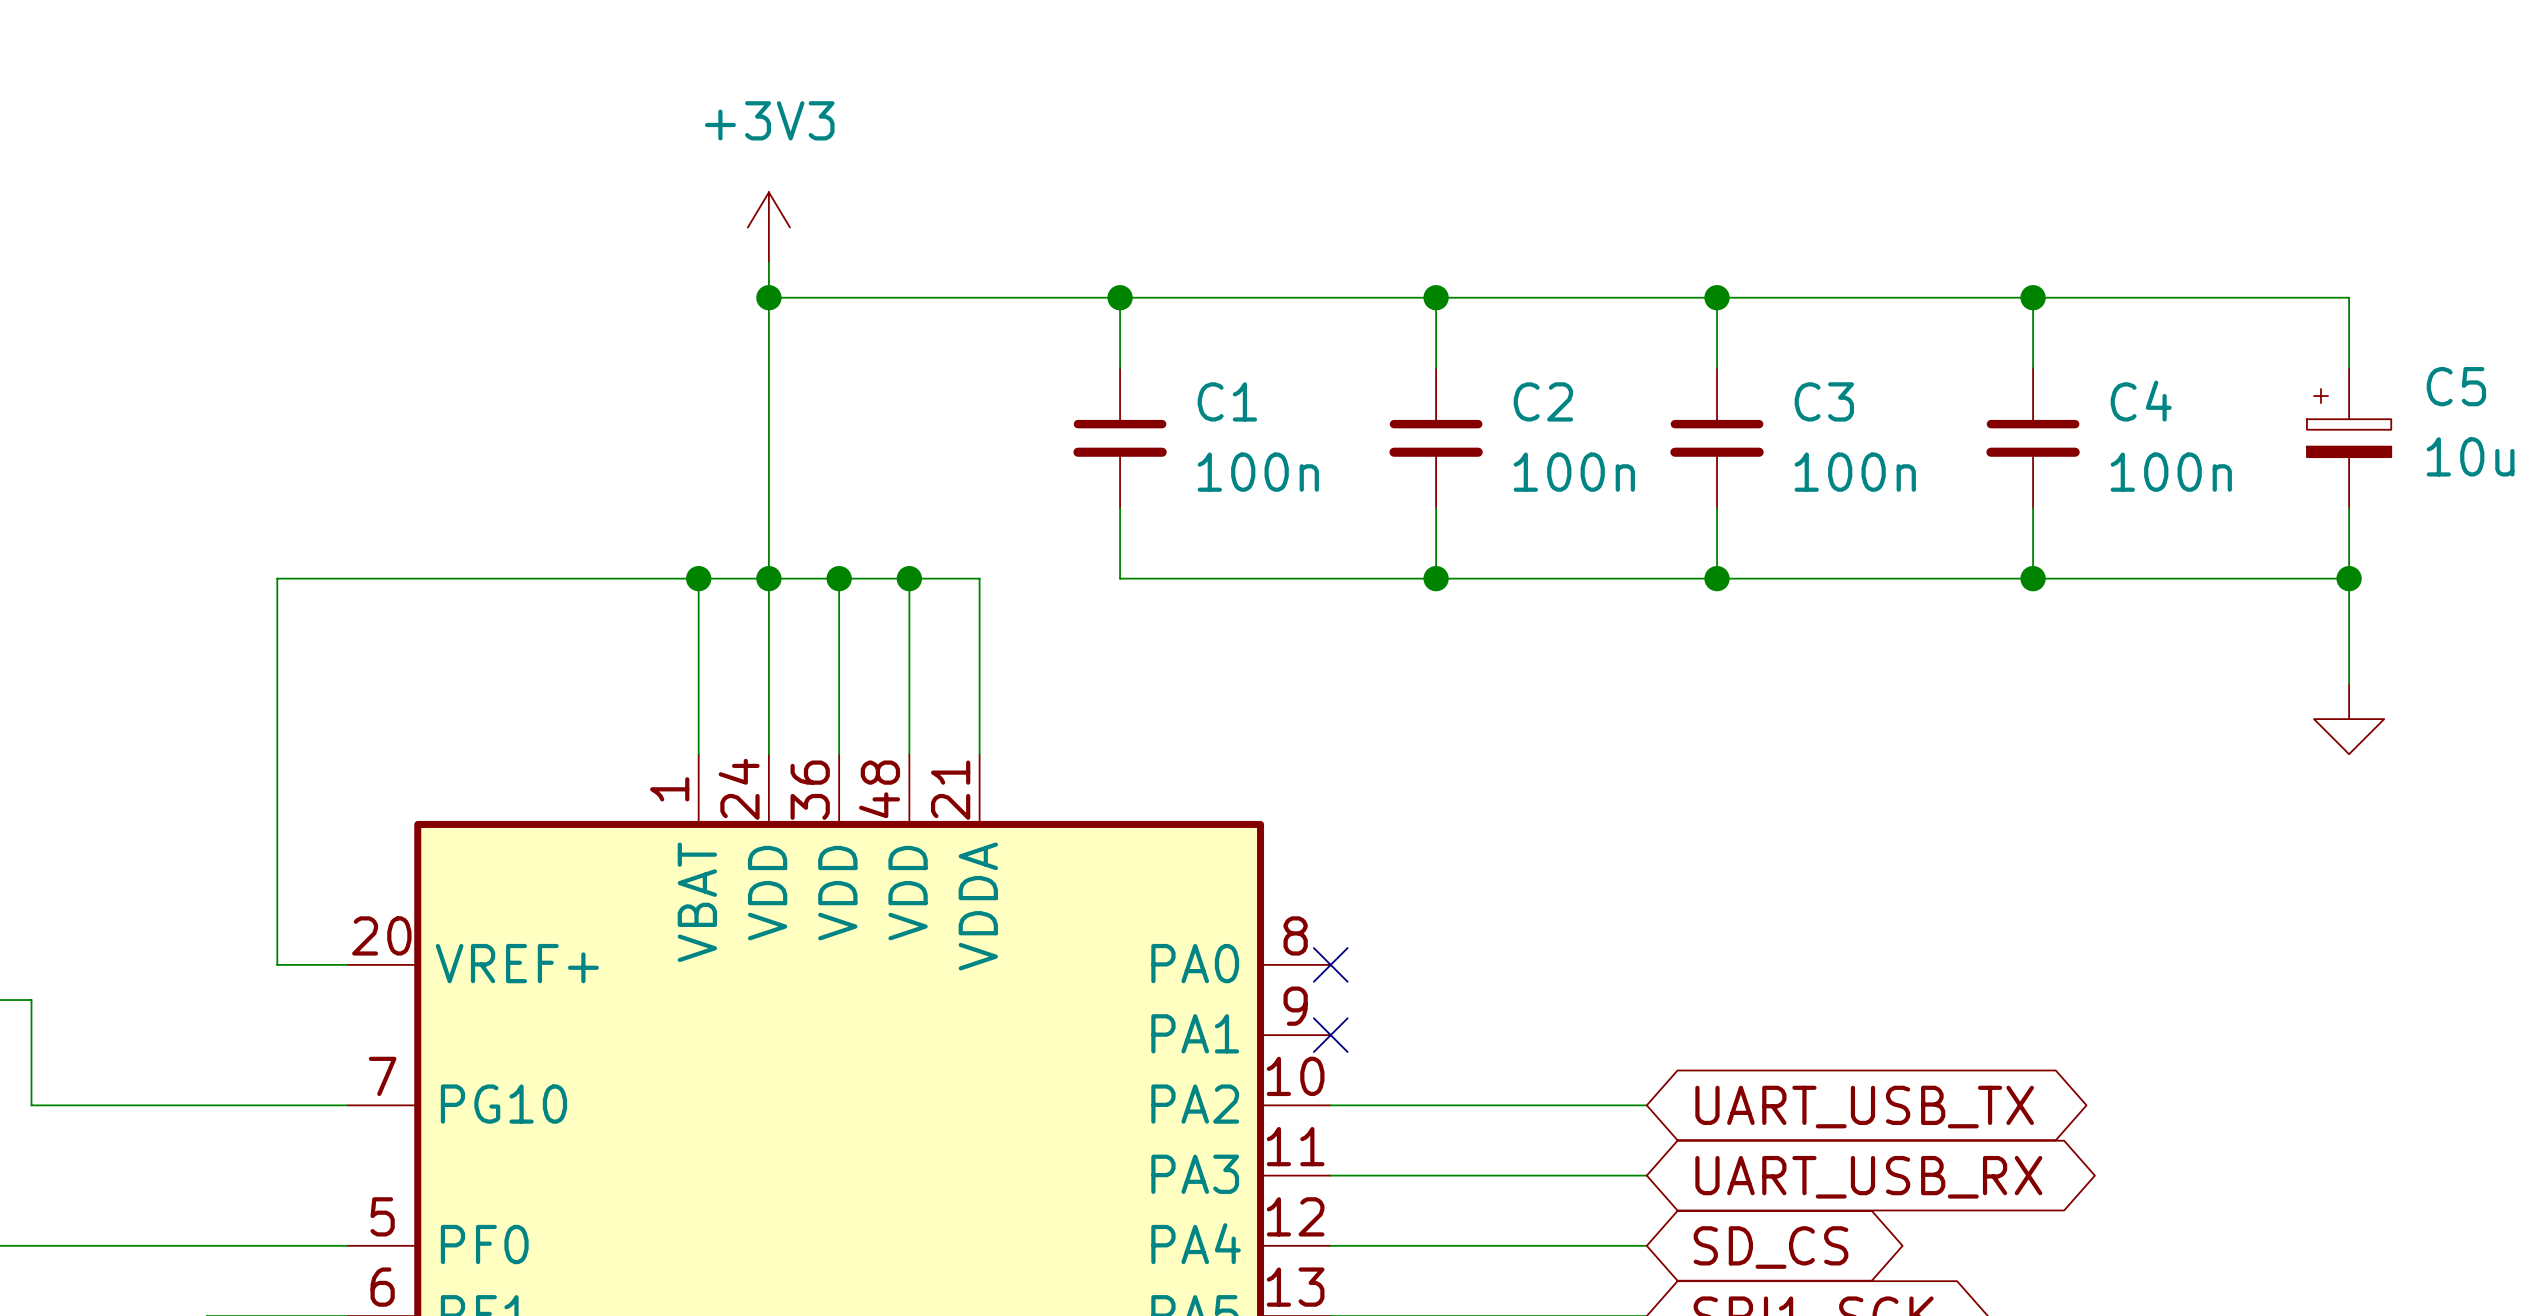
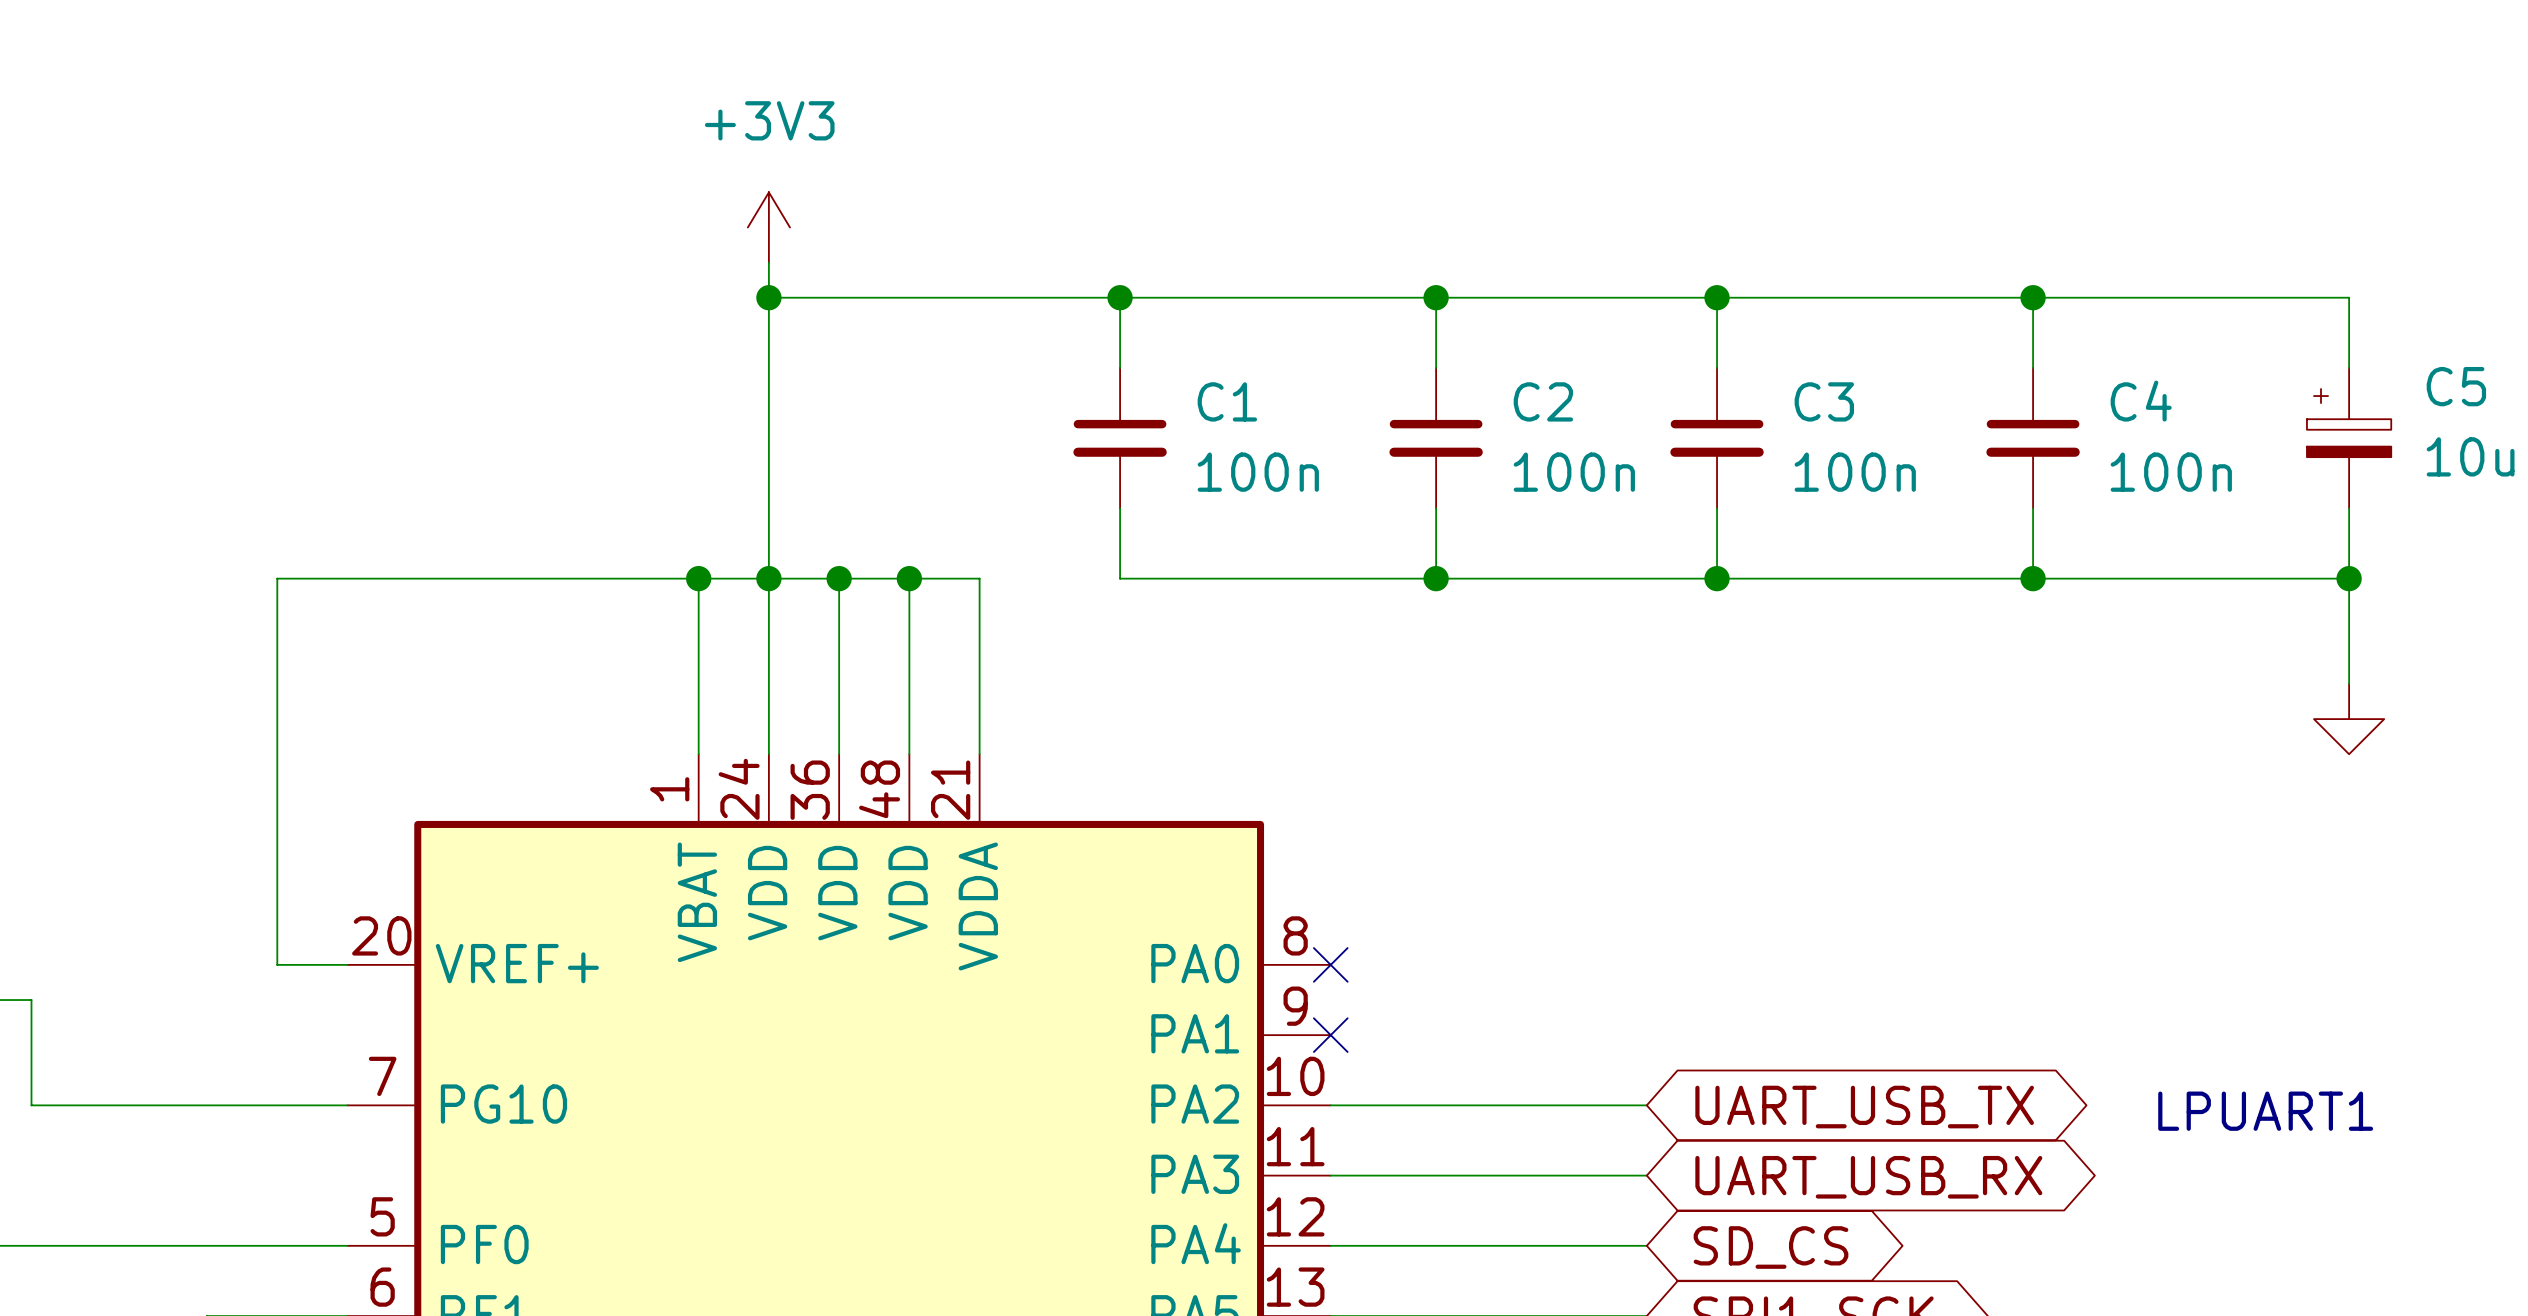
text: none -> LPUART1 (2265, 1111)

